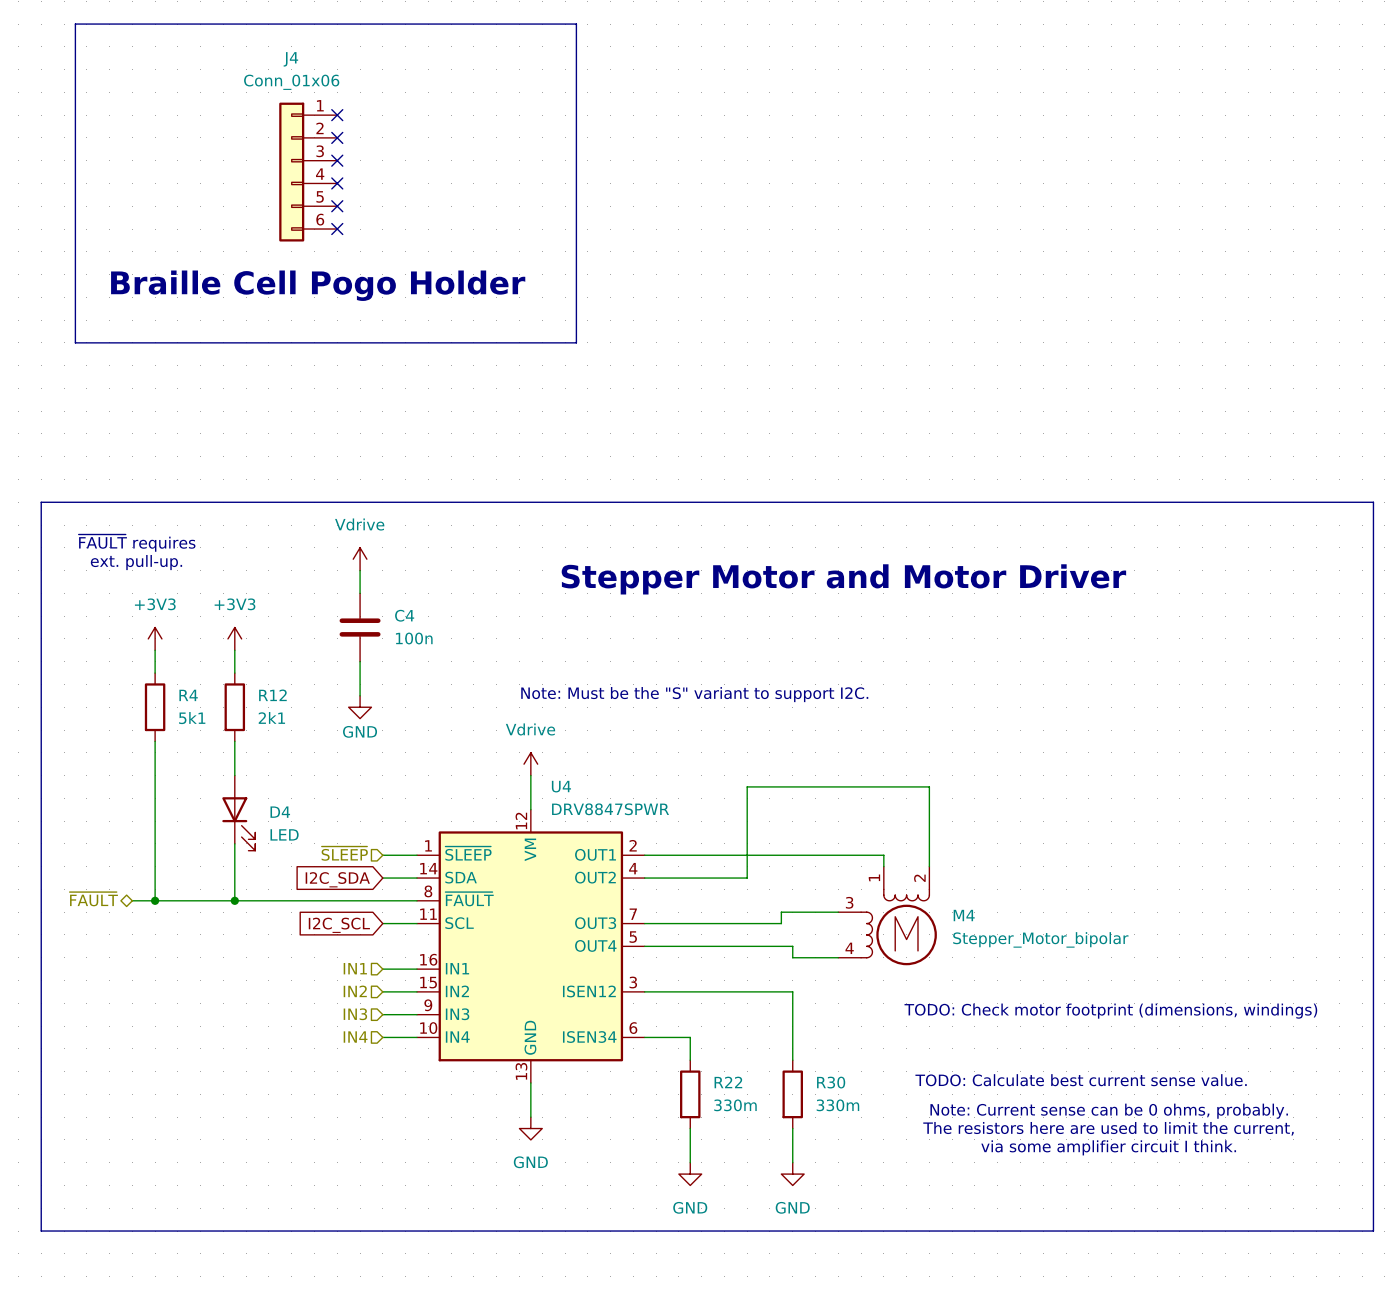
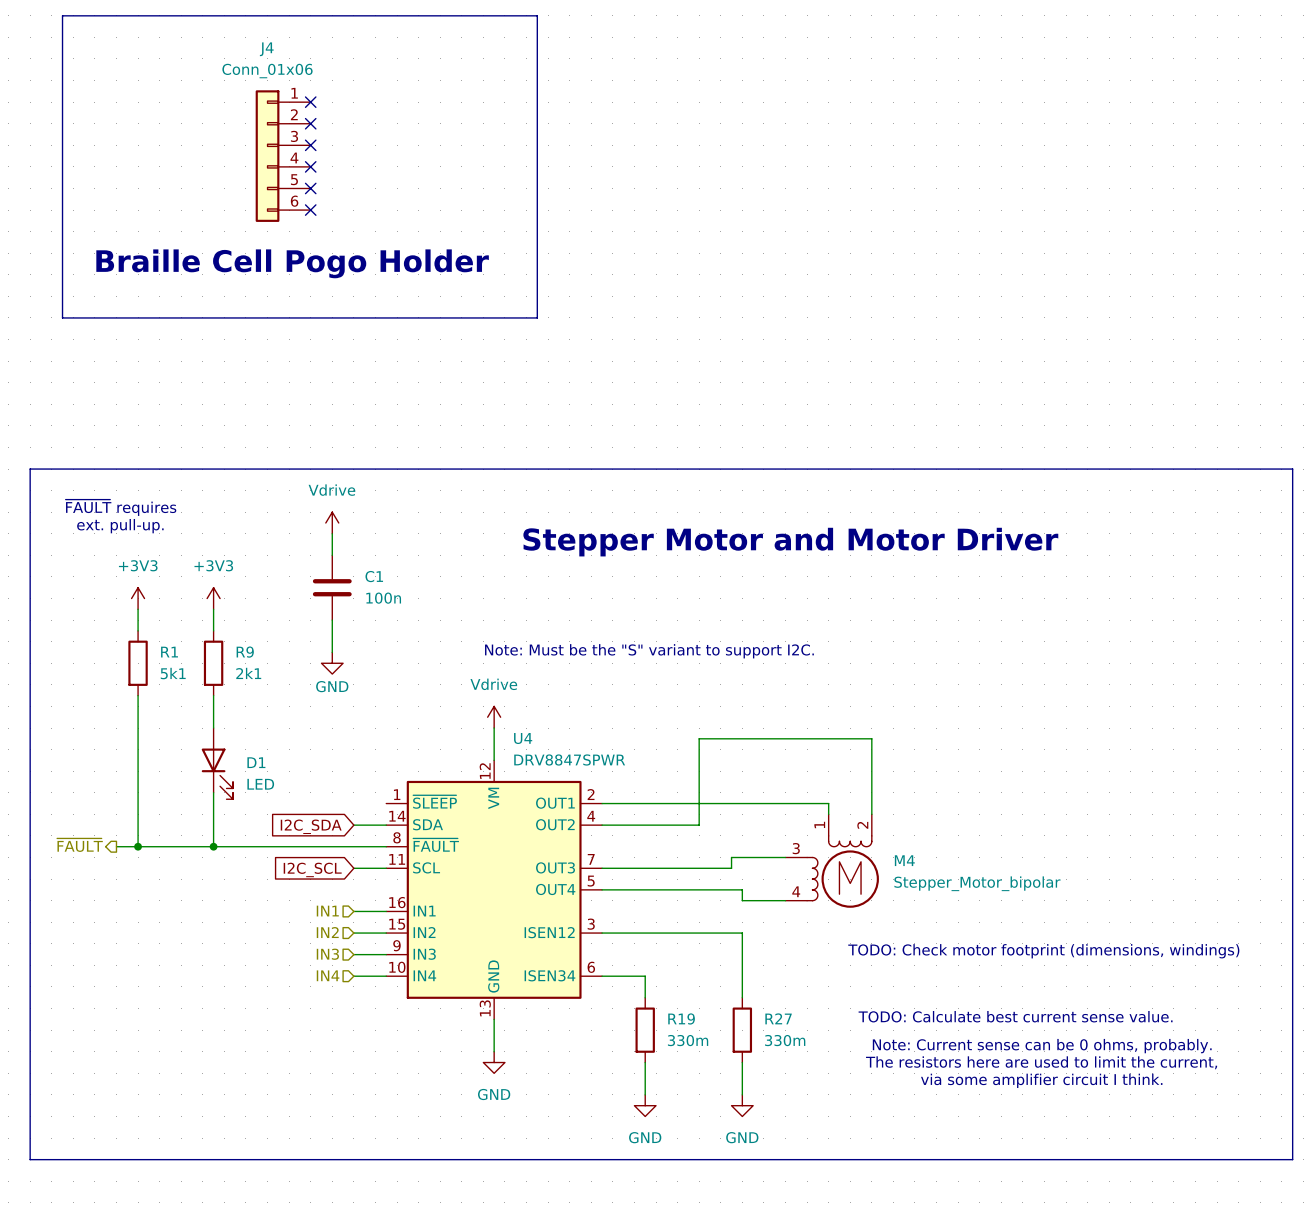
C4 name: C4 (404, 615) -> C1 (374, 576)
R4 name: R4 (188, 695) -> R1 (169, 652)
R12 name: R12 (272, 695) -> R9 (245, 652)
D4 name: D4 (280, 812) -> D1 (256, 762)
hierarchical label: ~{SLEEP} (344, 853) -> none
wire: (382, 855) (416, 855) -> none
hierarchical label shape: bidirectional (93, 899) -> output (79, 845)
R22 name: R22 (728, 1082) -> R19 (681, 1018)
R30 name: R30 (831, 1082) -> R27 (778, 1018)

